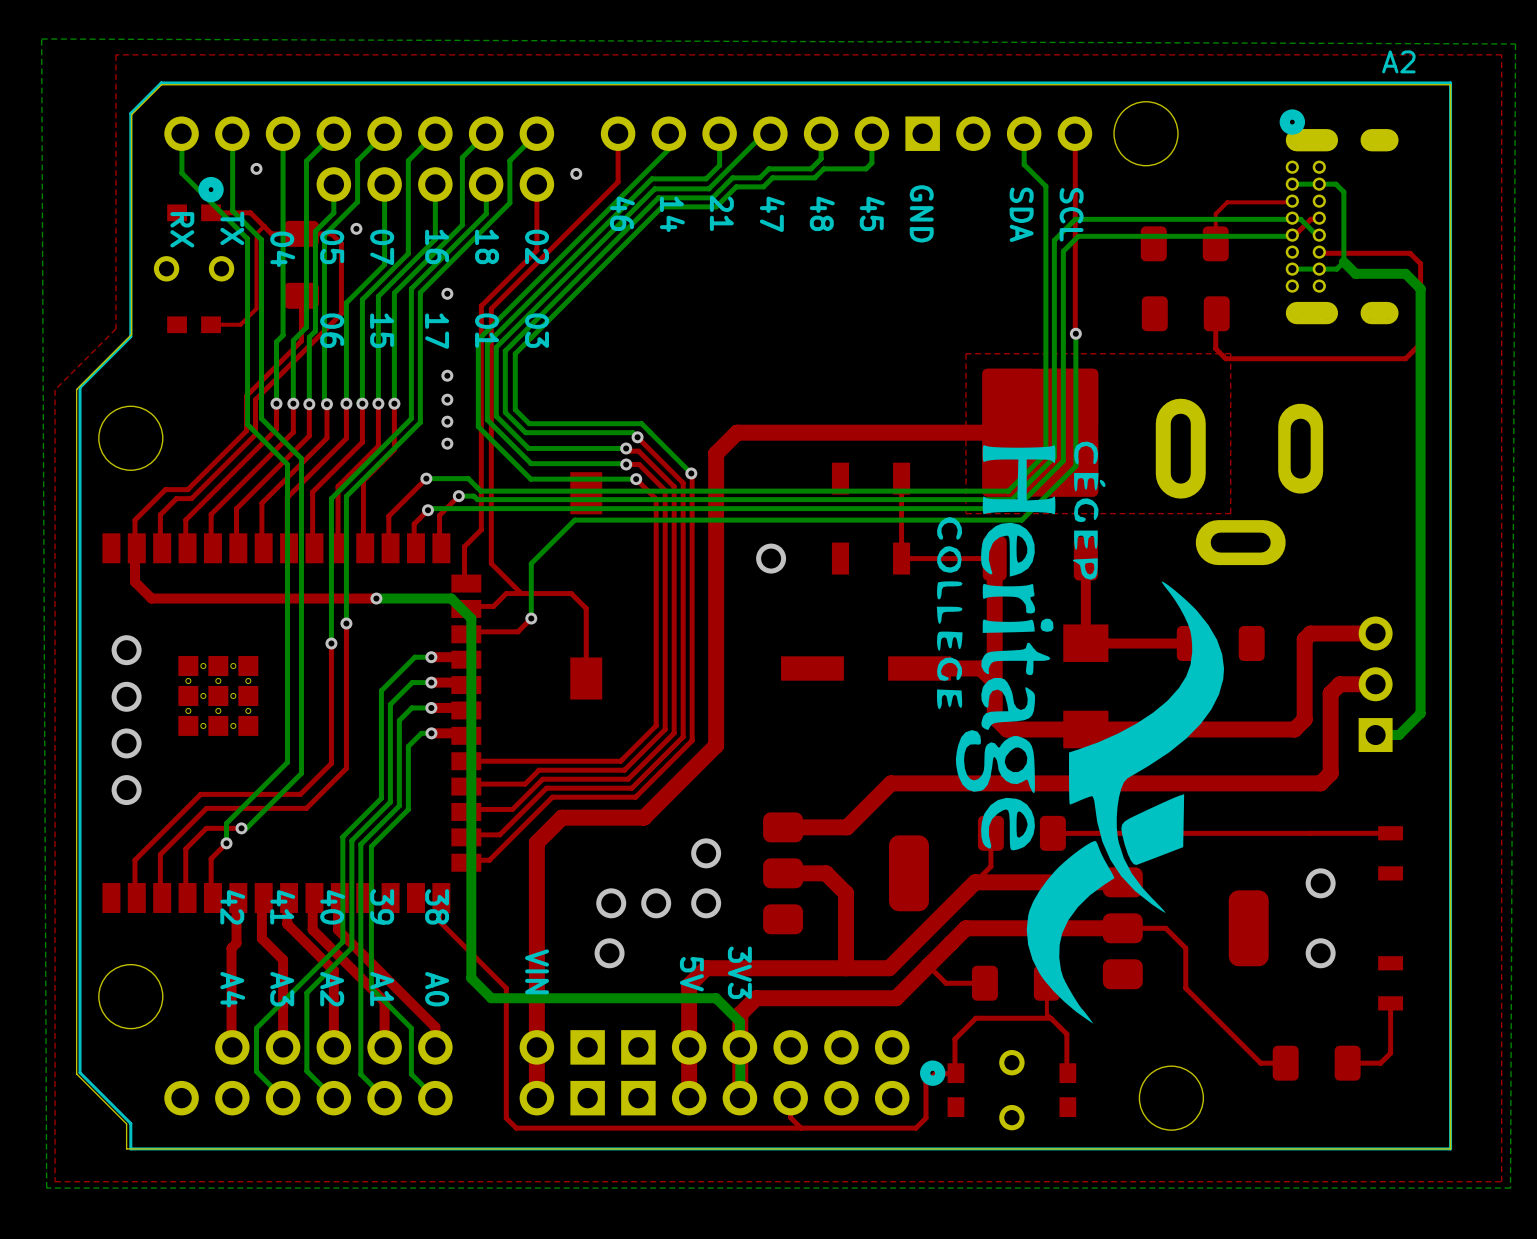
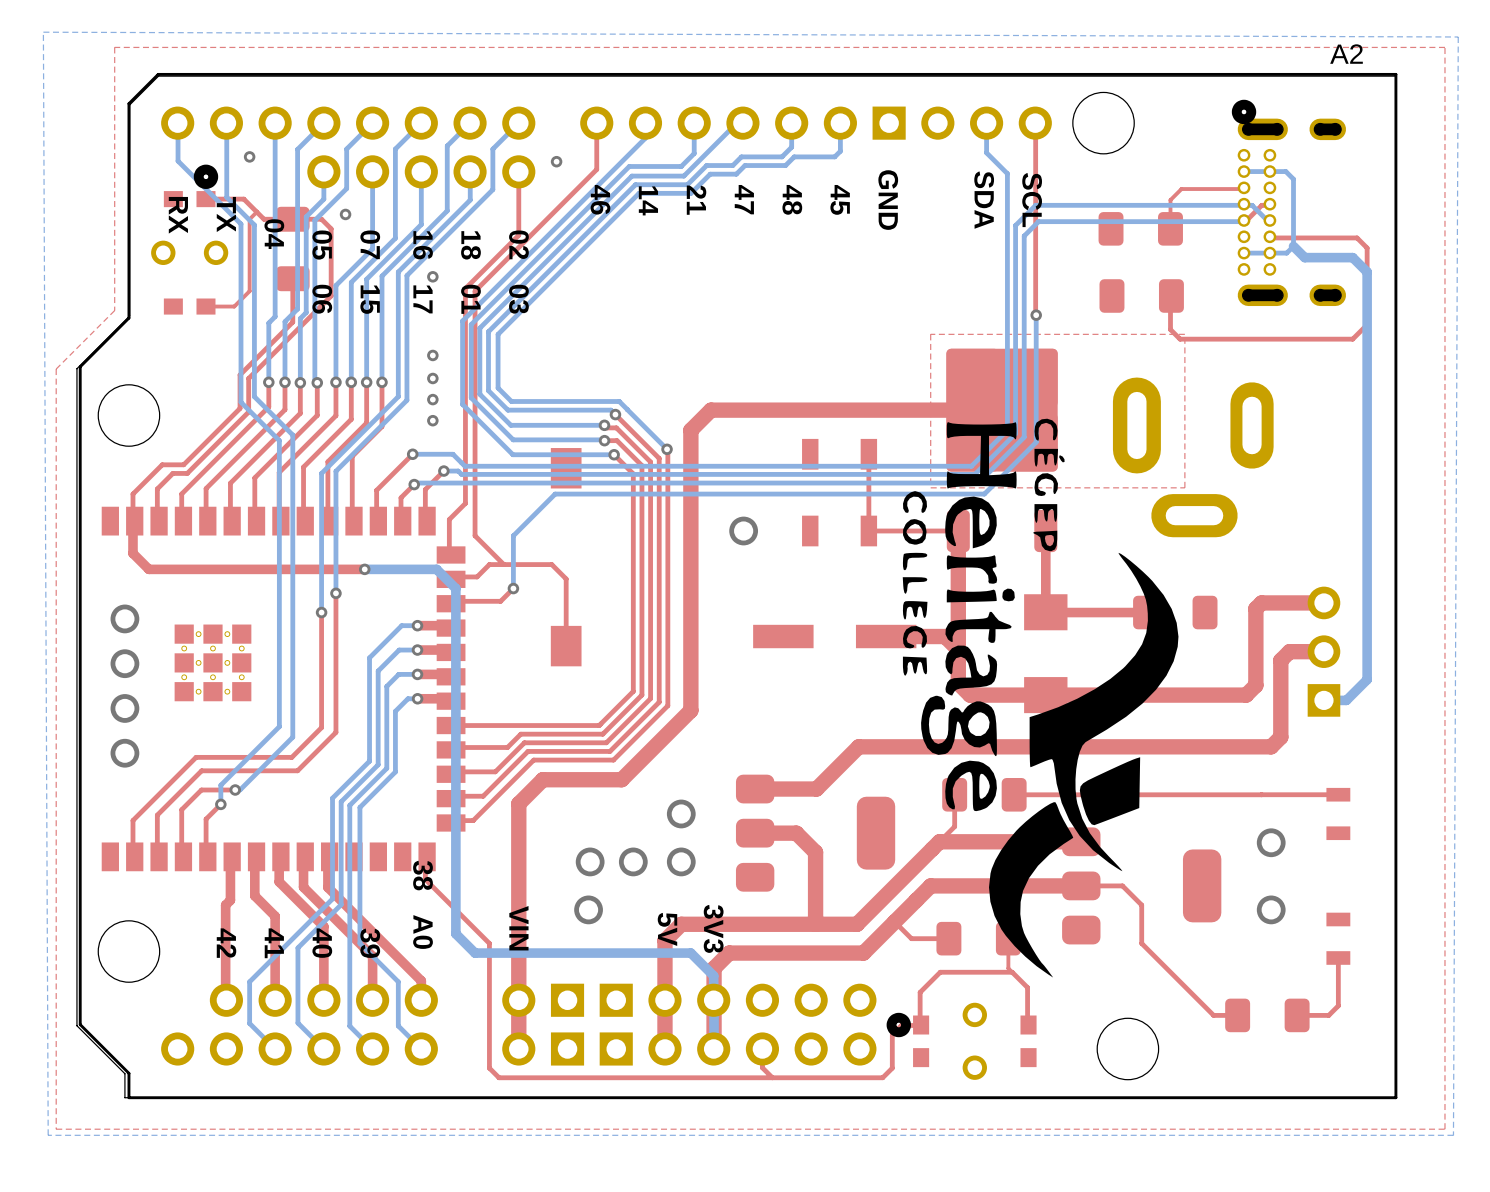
text: 39 A1 (382, 947) -> none
text: 42 A4 (232, 948) -> none
text: 41 A3 (282, 948) -> none
text: 40 A2 (332, 948) -> none
text: none -> 39 (370, 943)
text: none -> 42 (226, 943)
text: none -> 41 (274, 943)
text: none -> 40 (322, 943)

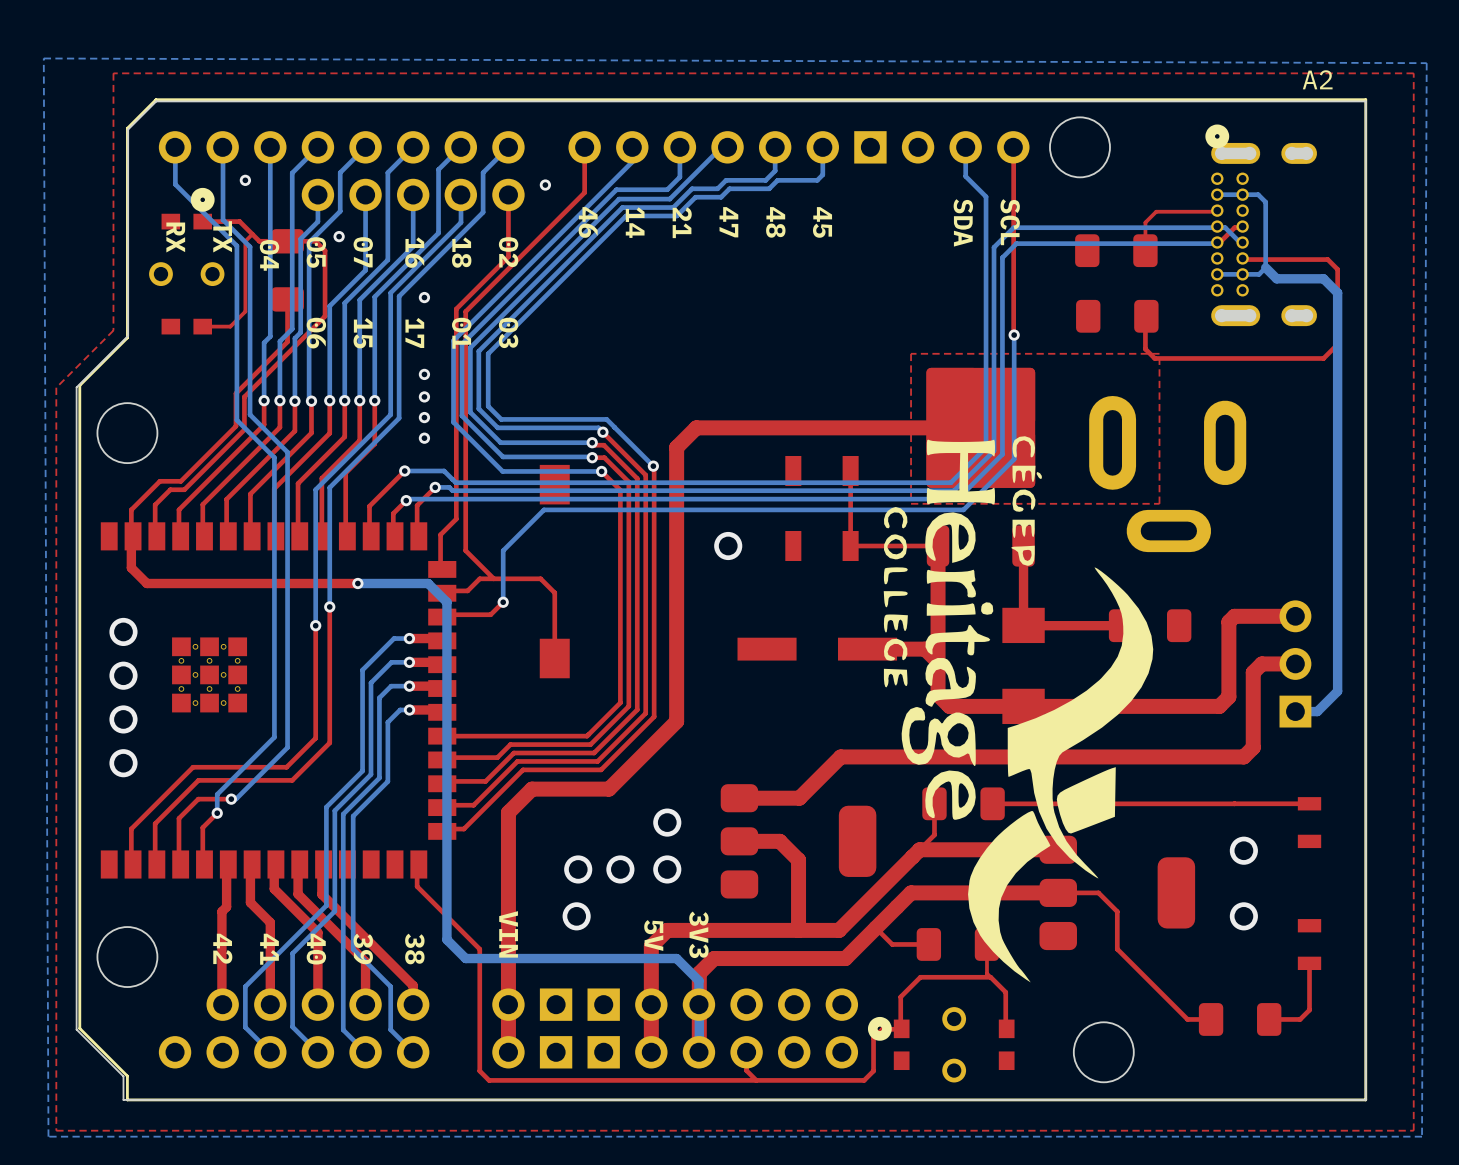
text: GND (888, 200) -> none
text: 38 A0 (422, 904) -> none
text: none -> 38 (414, 948)

